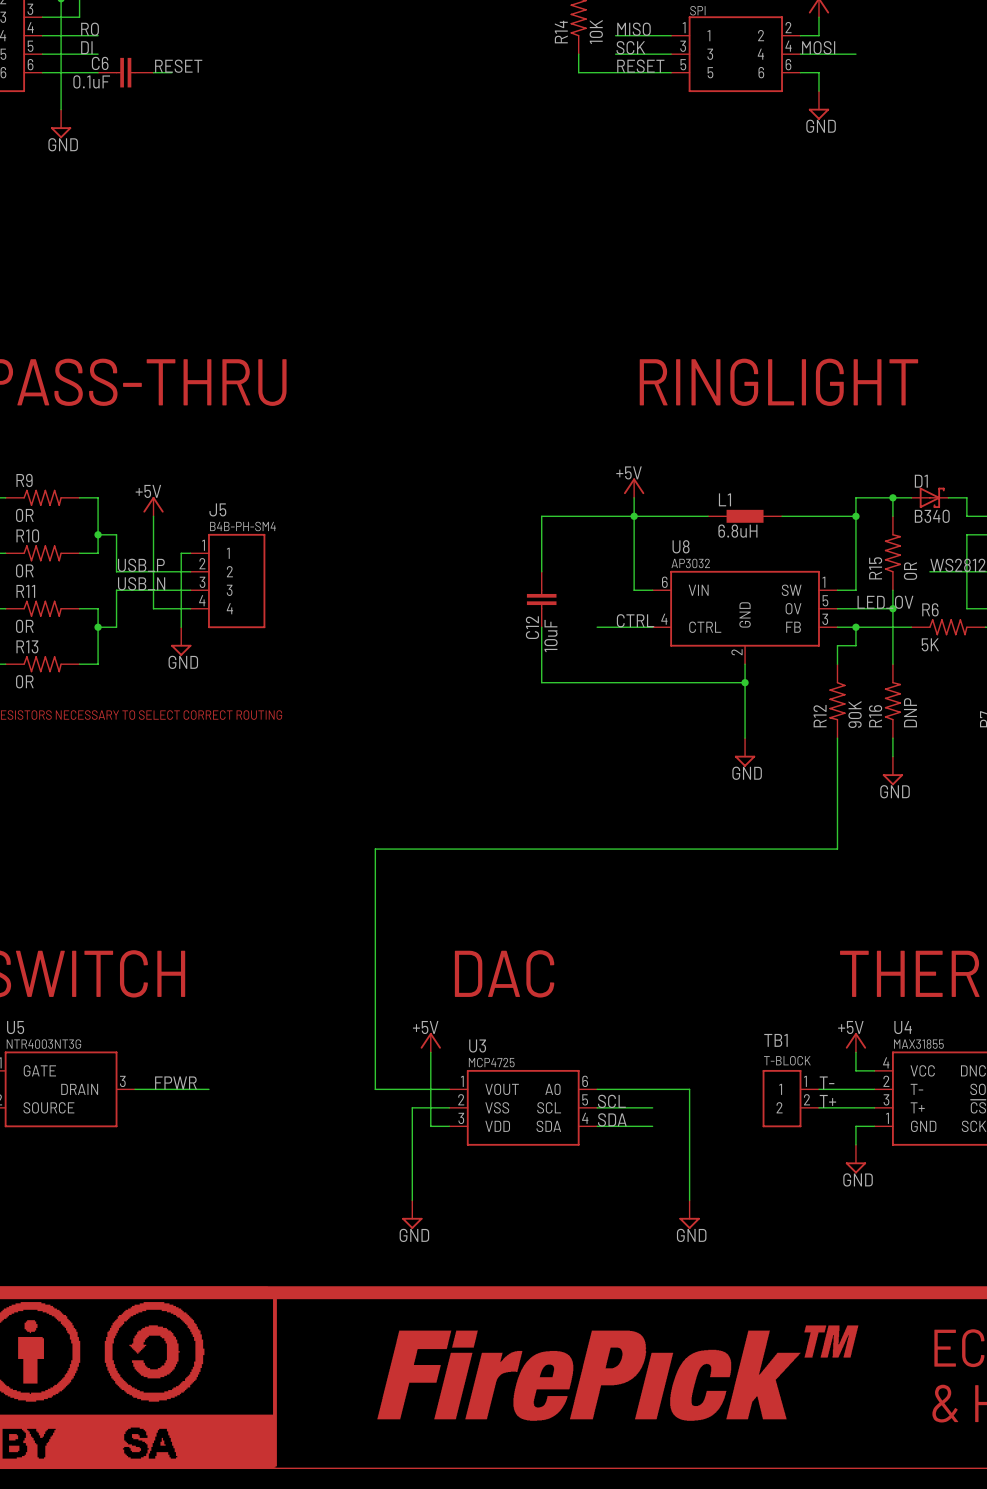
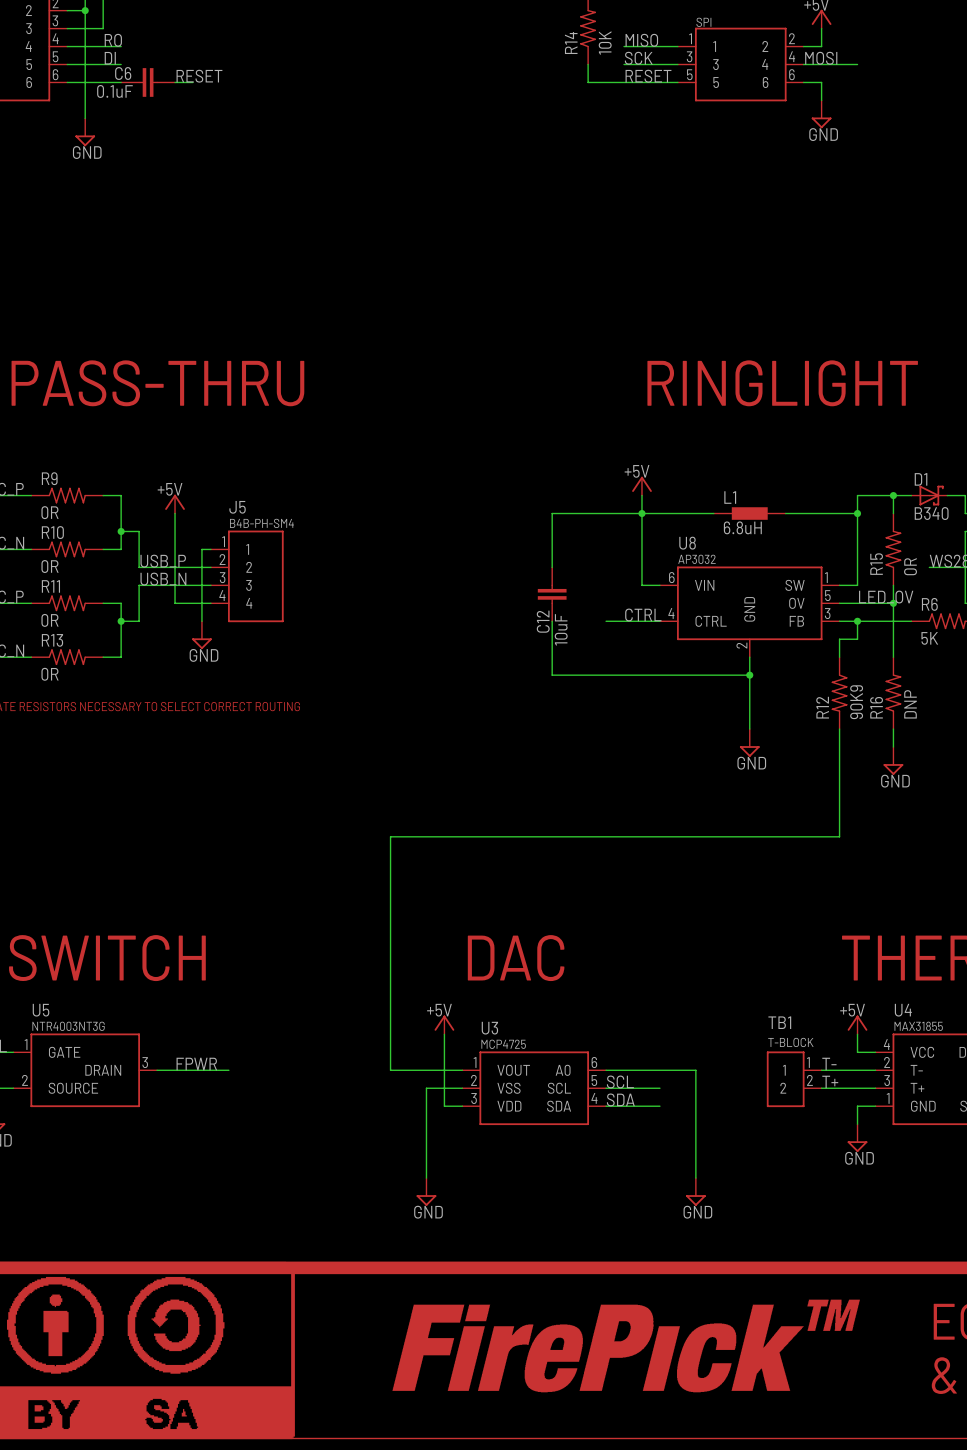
R12 value: 90K (855, 714) -> 90K9 (856, 702)

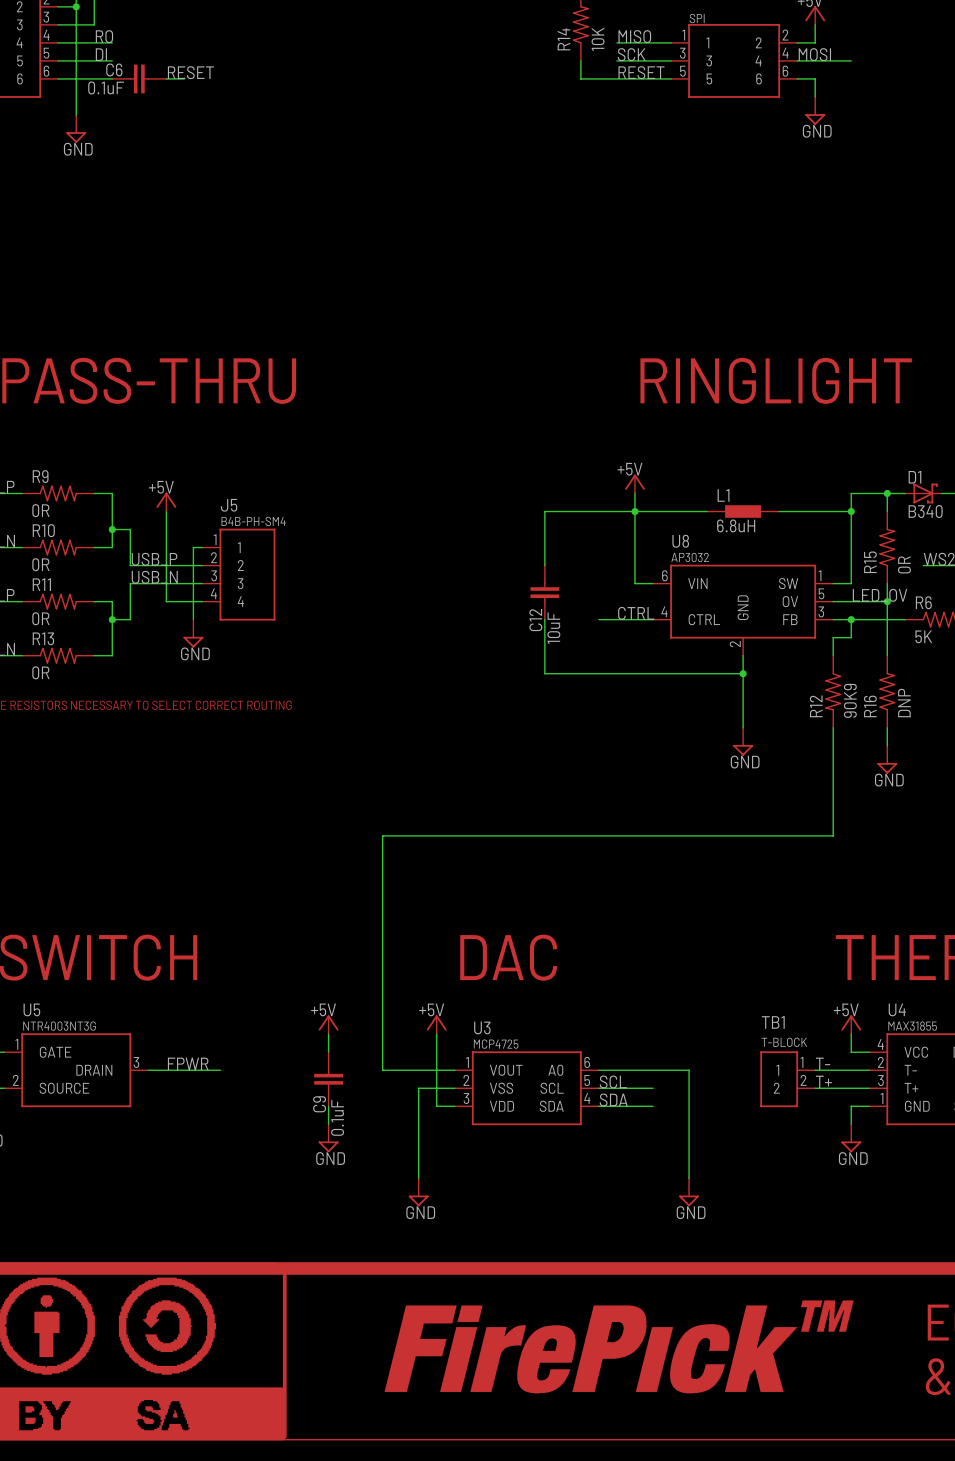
power symbol: none -> +5V (328, 1024)
wire: none -> (328, 1034) (328, 1052)
C9: none -> 0.1uF (328, 1079)
wire: none -> (328, 1106) (328, 1124)
power symbol: none -> GND (328, 1138)

